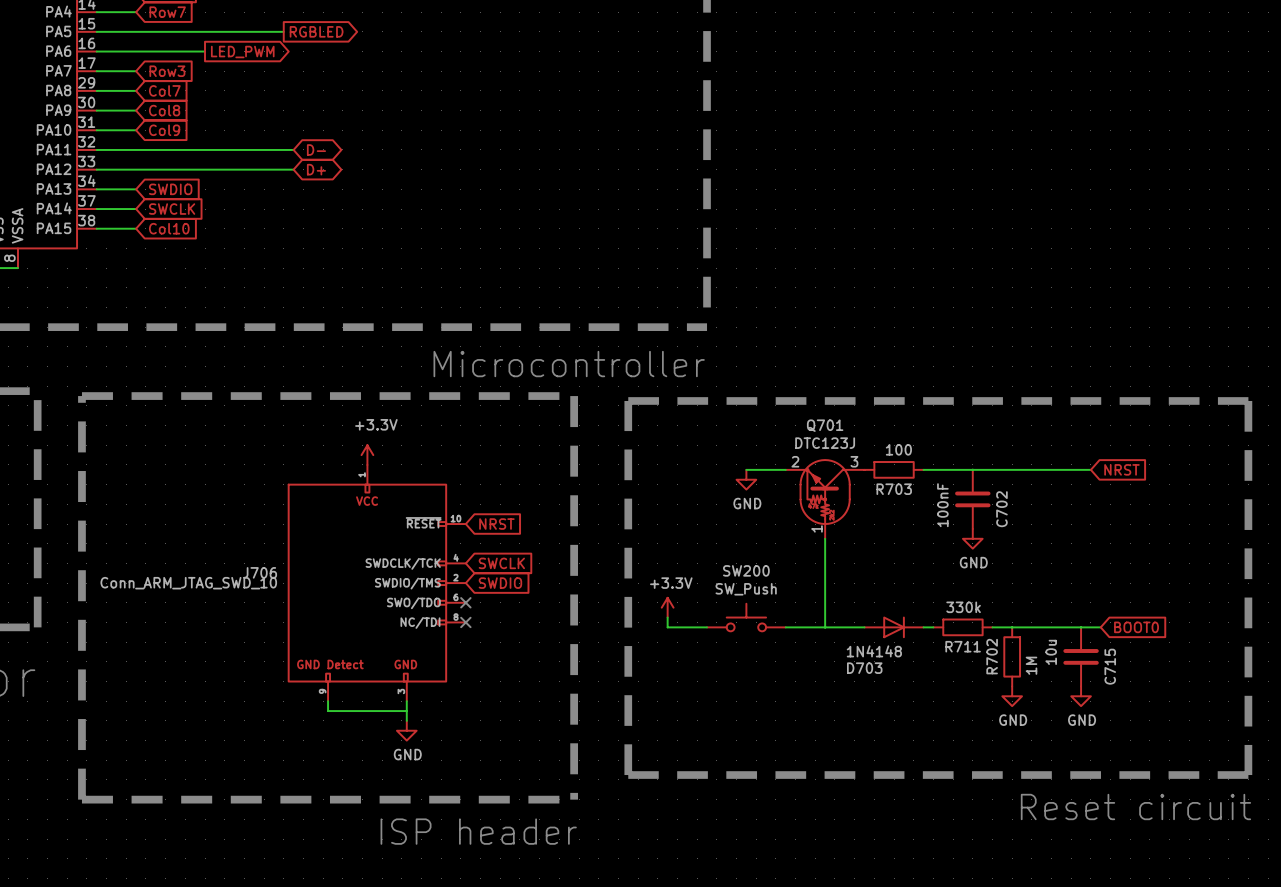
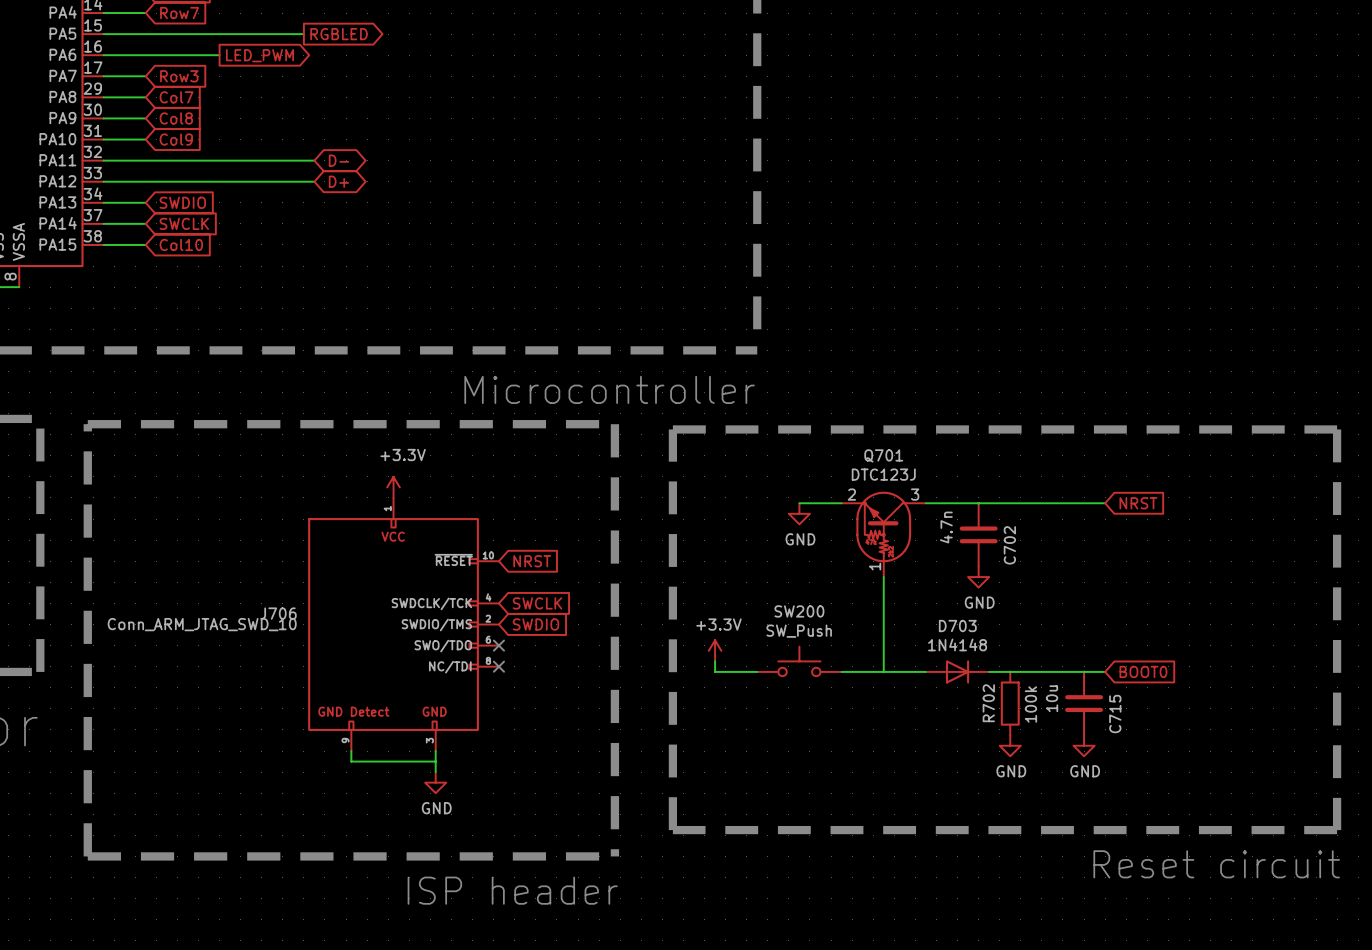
R703: 100 (894, 469) -> none
wire: (1031, 469) (1090, 469) -> (925, 503) (989, 503)
global label position: NRST (1121, 469) -> NRST (1138, 503)
C702 position: (972, 499) -> (978, 534)
C702 value: 100nF (942, 505) -> 4.7n (946, 527)
power symbol position: GND (972, 538) -> GND (978, 577)
wire: none -> (999, 671) (1062, 671)
R711: 330k (962, 627) -> none
wire: (1031, 627) (1100, 627) -> none
global label position: BOOT0 (1136, 627) -> BOOT0 (1143, 671)
D703 value position: 1N4148 (874, 651) -> 1N4148 (957, 644)
R702 position: (1012, 656) -> (1010, 703)
C715 position: (1081, 656) -> (1084, 703)
R702 value: 1M (1031, 665) -> 100k (1030, 704)
D703 name position: D703 (864, 668) -> D703 (957, 626)
power symbol: none -> GND (1010, 745)
power symbol: GND (1081, 696) -> none

